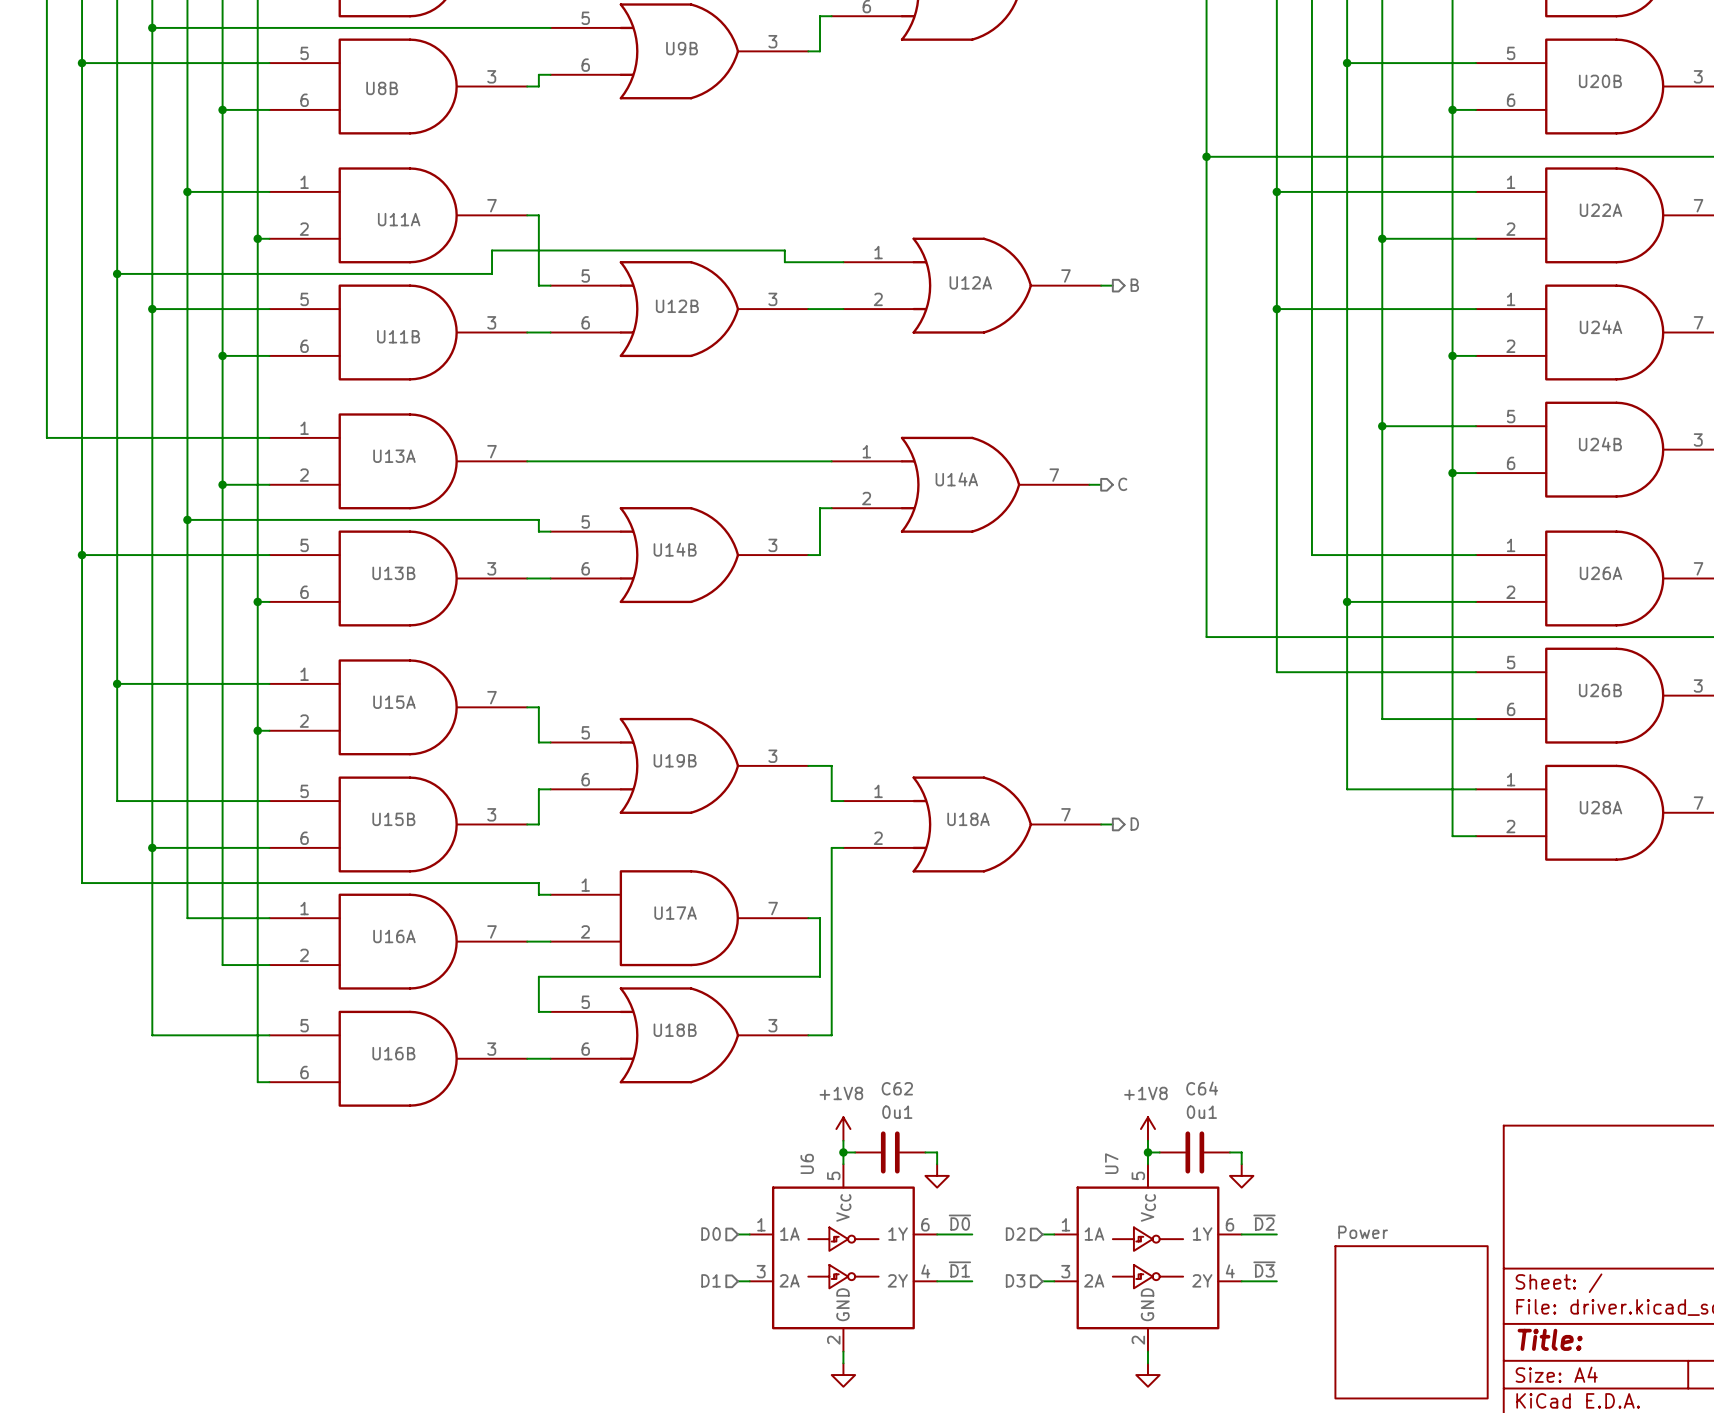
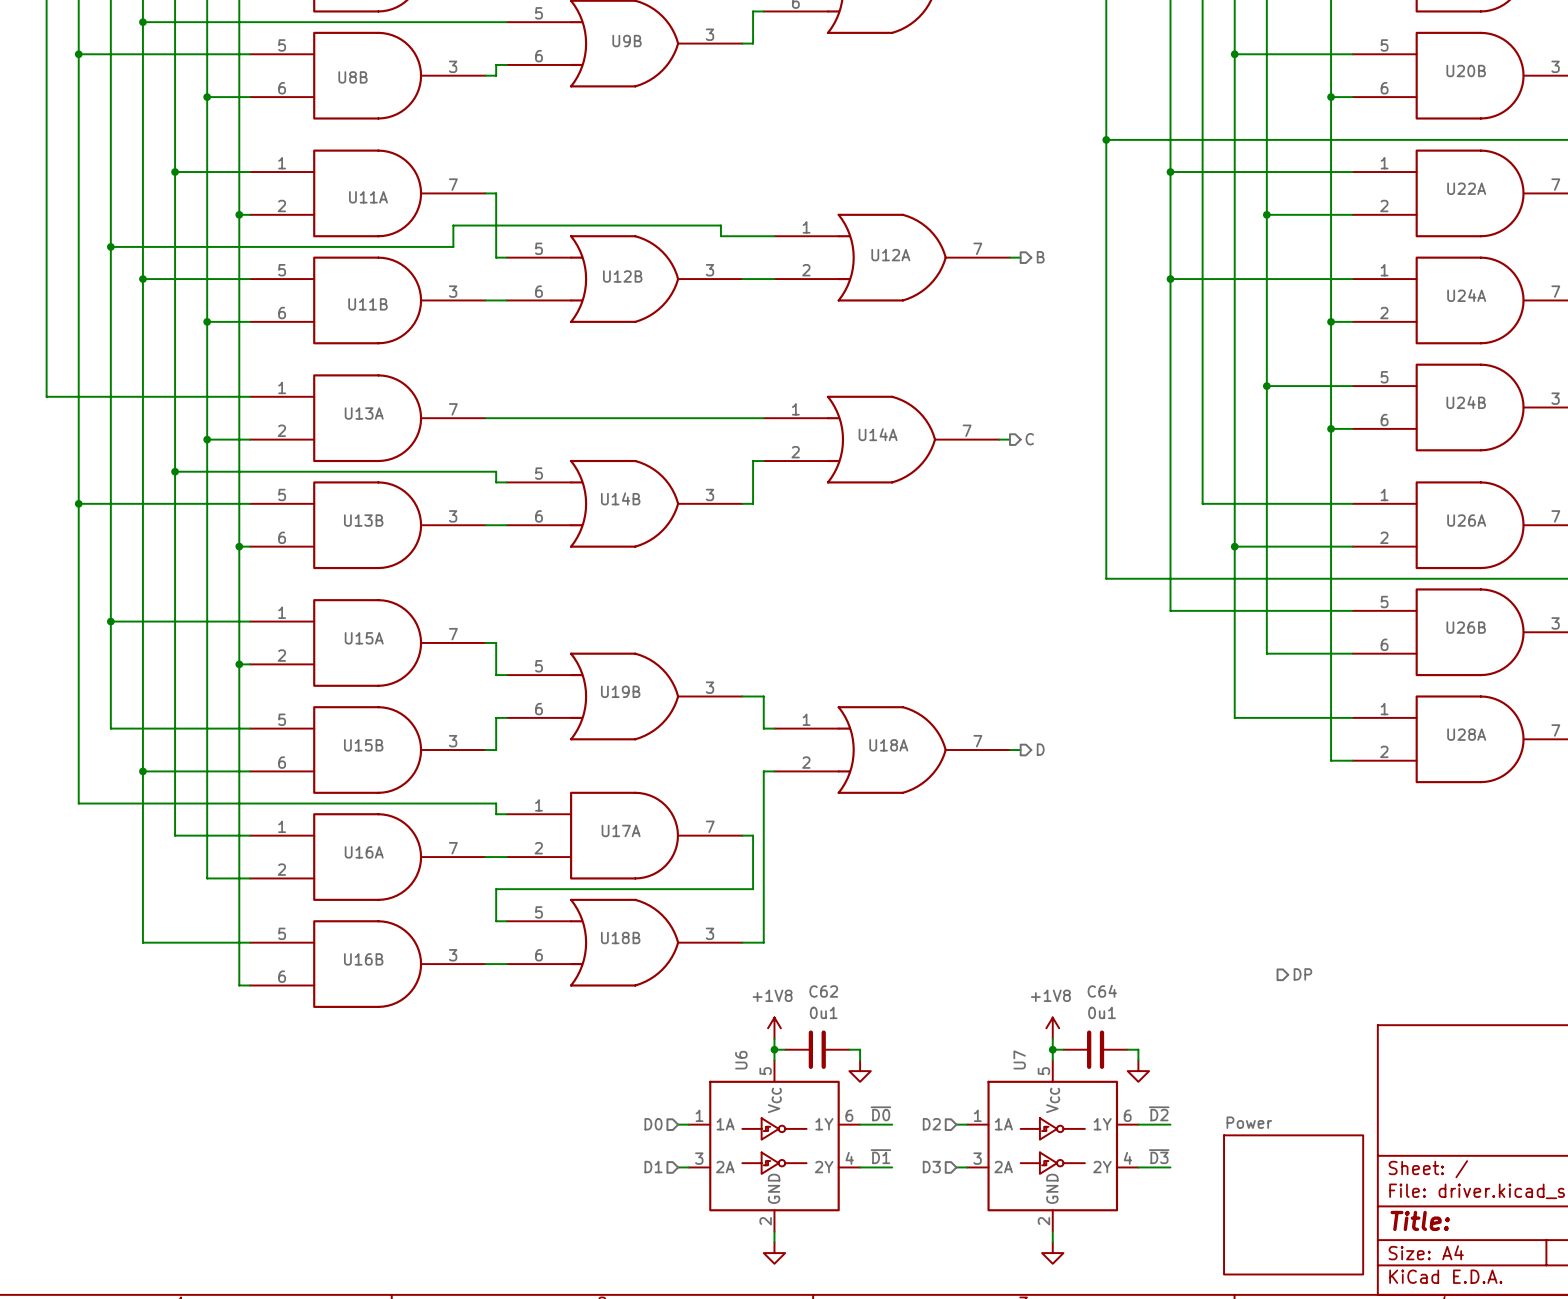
hierarchical label: none -> DP (1302, 974)

